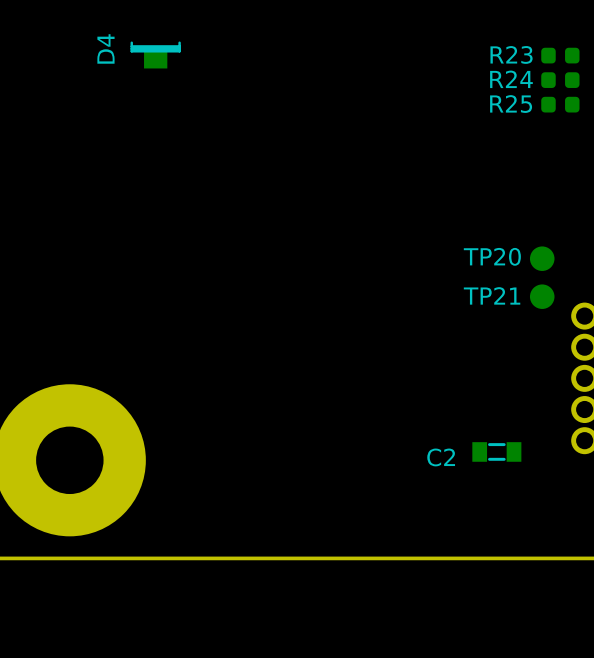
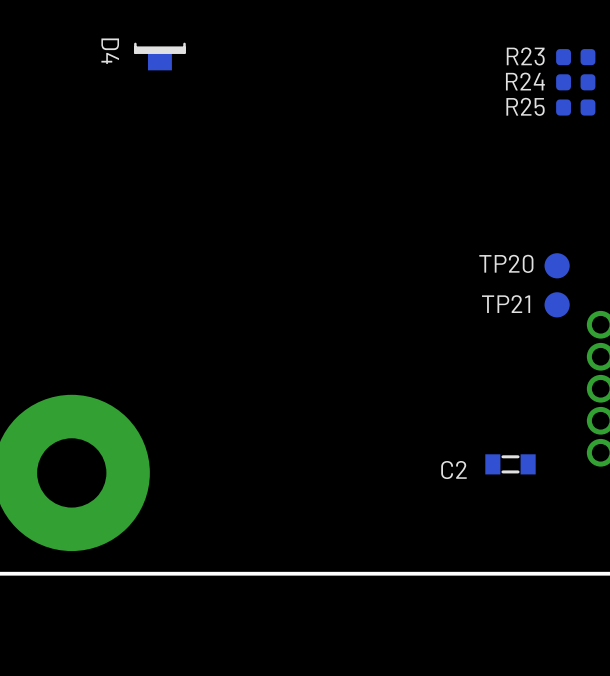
D4 name rotation: 0° (105, 48) -> 180° (110, 51)

